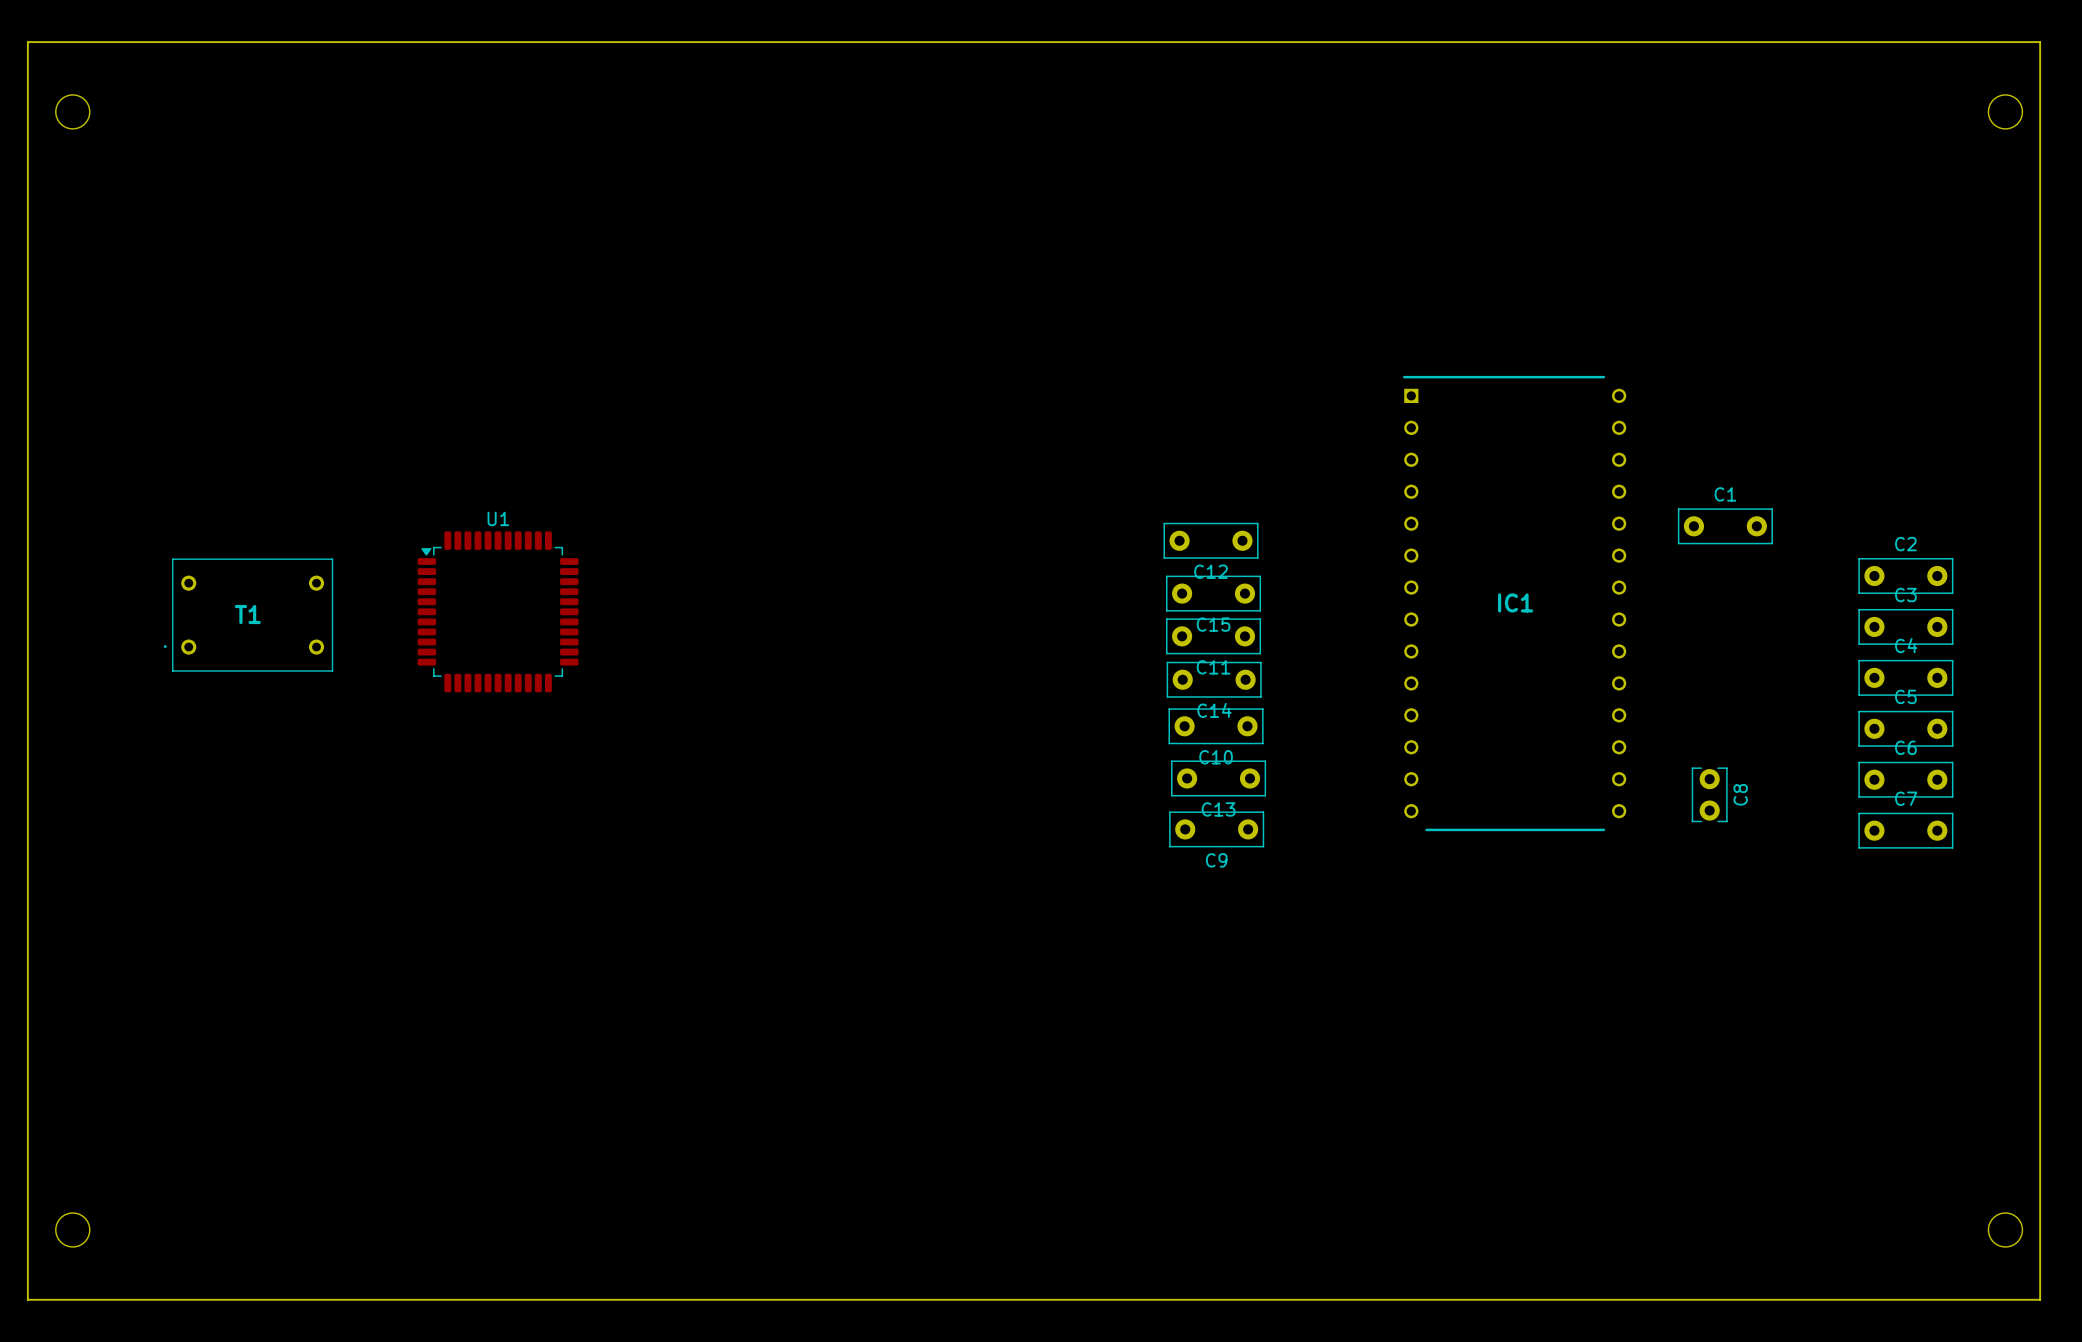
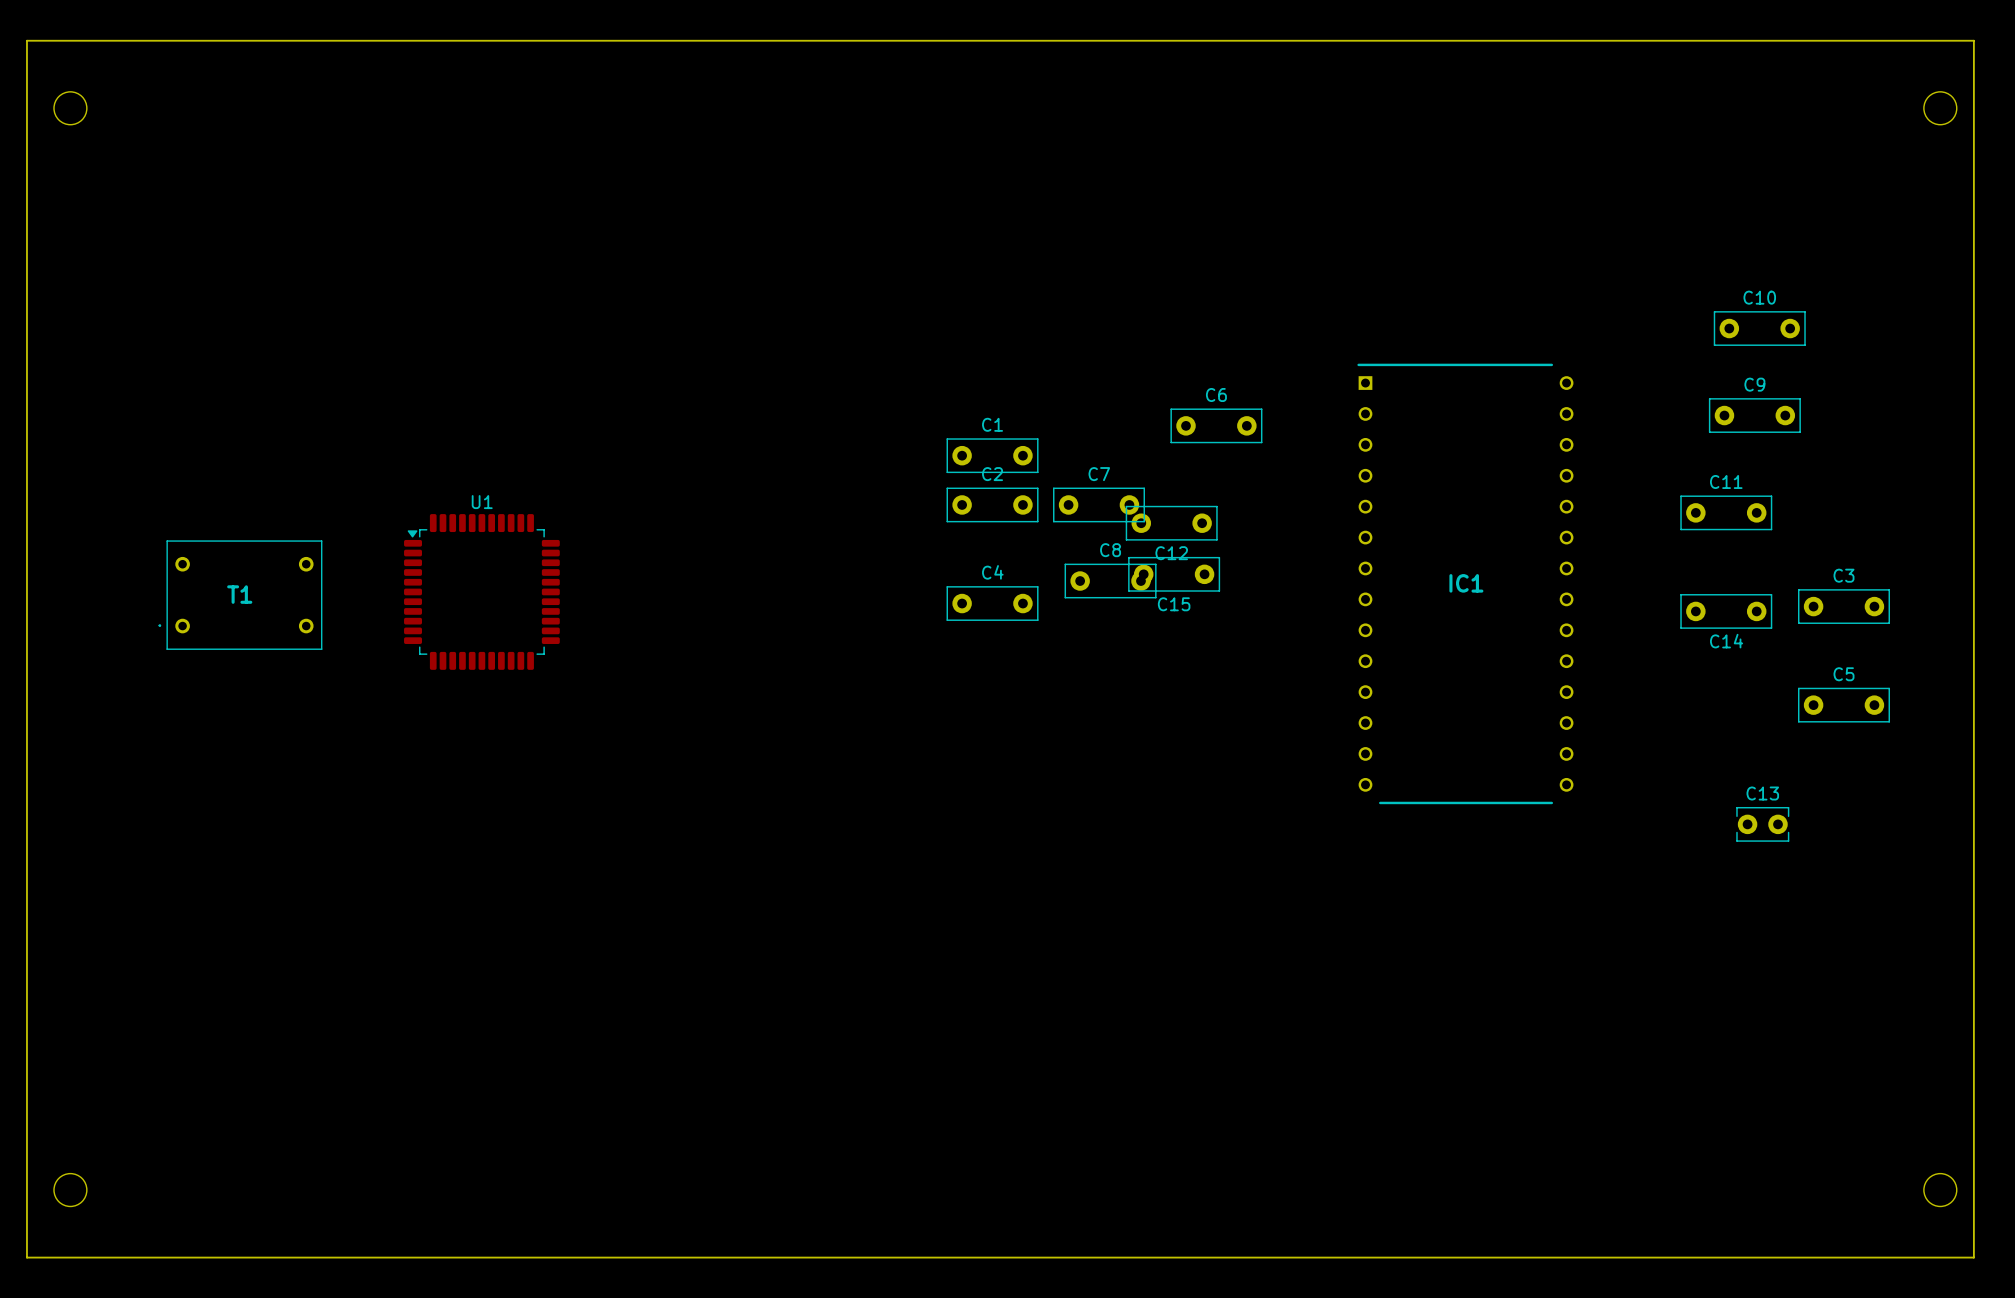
C1 position: (1725, 526) -> (992, 455)
C2 position: (1905, 575) -> (992, 504)
C11 position: (1213, 636) -> (1726, 512)
C11 name position: C11 (1213, 667) -> C11 (1726, 482)
C4 position: (1905, 677) -> (992, 603)
C14 position: (1214, 679) -> (1726, 611)
C10 position: (1216, 726) -> (1759, 328)
C10 name position: C10 (1216, 757) -> C10 (1759, 297)
C13 footprint: [1171, 760, 1267, 797] -> [1736, 806, 1790, 842]
C8 footprint: [1691, 767, 1728, 823] -> [1064, 563, 1157, 599]
C6 position: (1905, 779) -> (1216, 425)
C8 name position: C8 (1740, 794) -> C8 (1110, 550)
C13 name position: C13 (1218, 809) -> C13 (1762, 793)
C9 position: (1216, 829) -> (1754, 415)
C7 position: (1905, 830) -> (1099, 504)
C9 name position: C9 (1216, 860) -> C9 (1754, 384)

